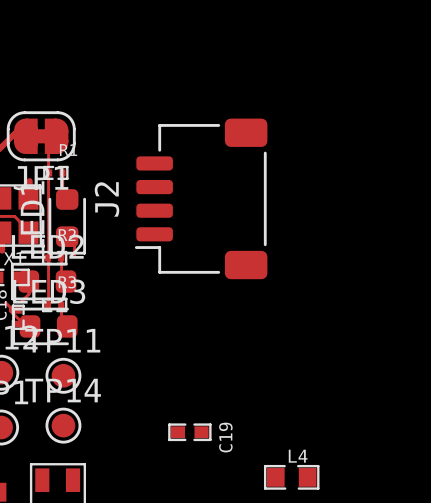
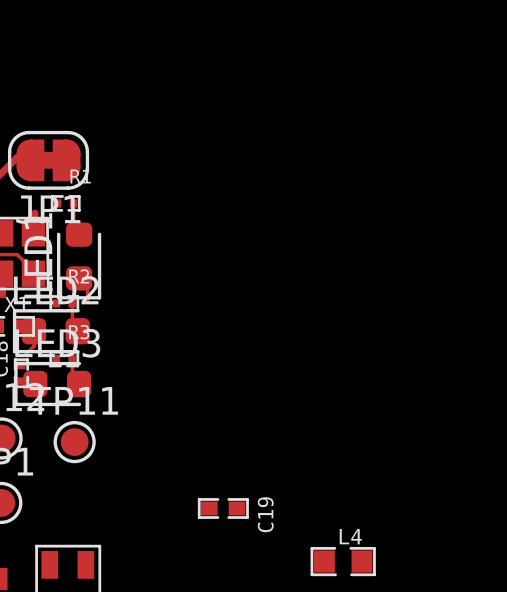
top track: (48, 134) (48, 305) -> none
J2: (201, 198) -> none
top track: (5, 302) (10, 307) (10, 310) (26, 326) (30, 326) -> none
TP14: (63, 425) -> none

